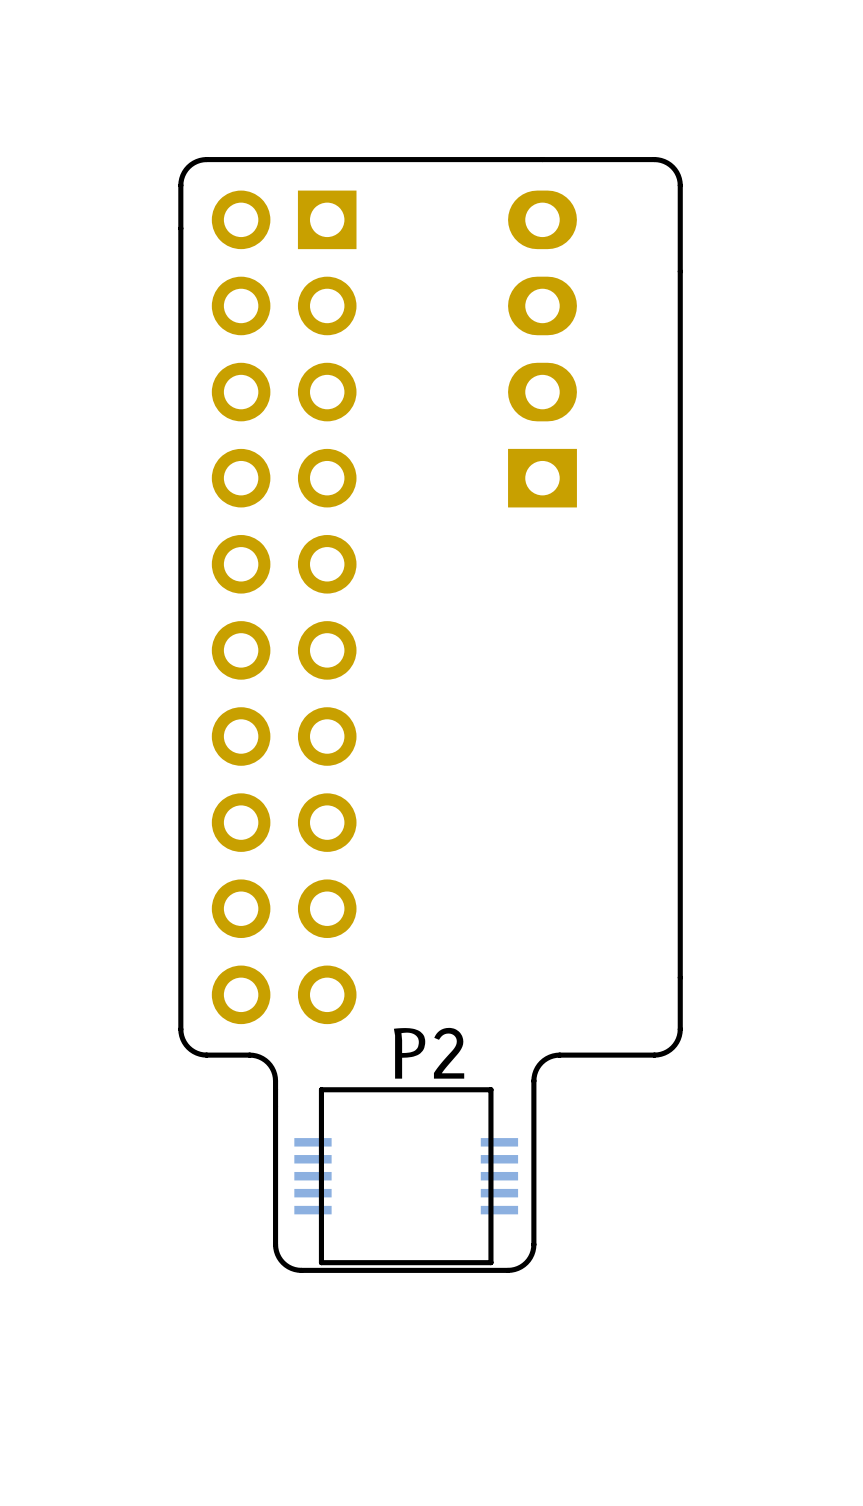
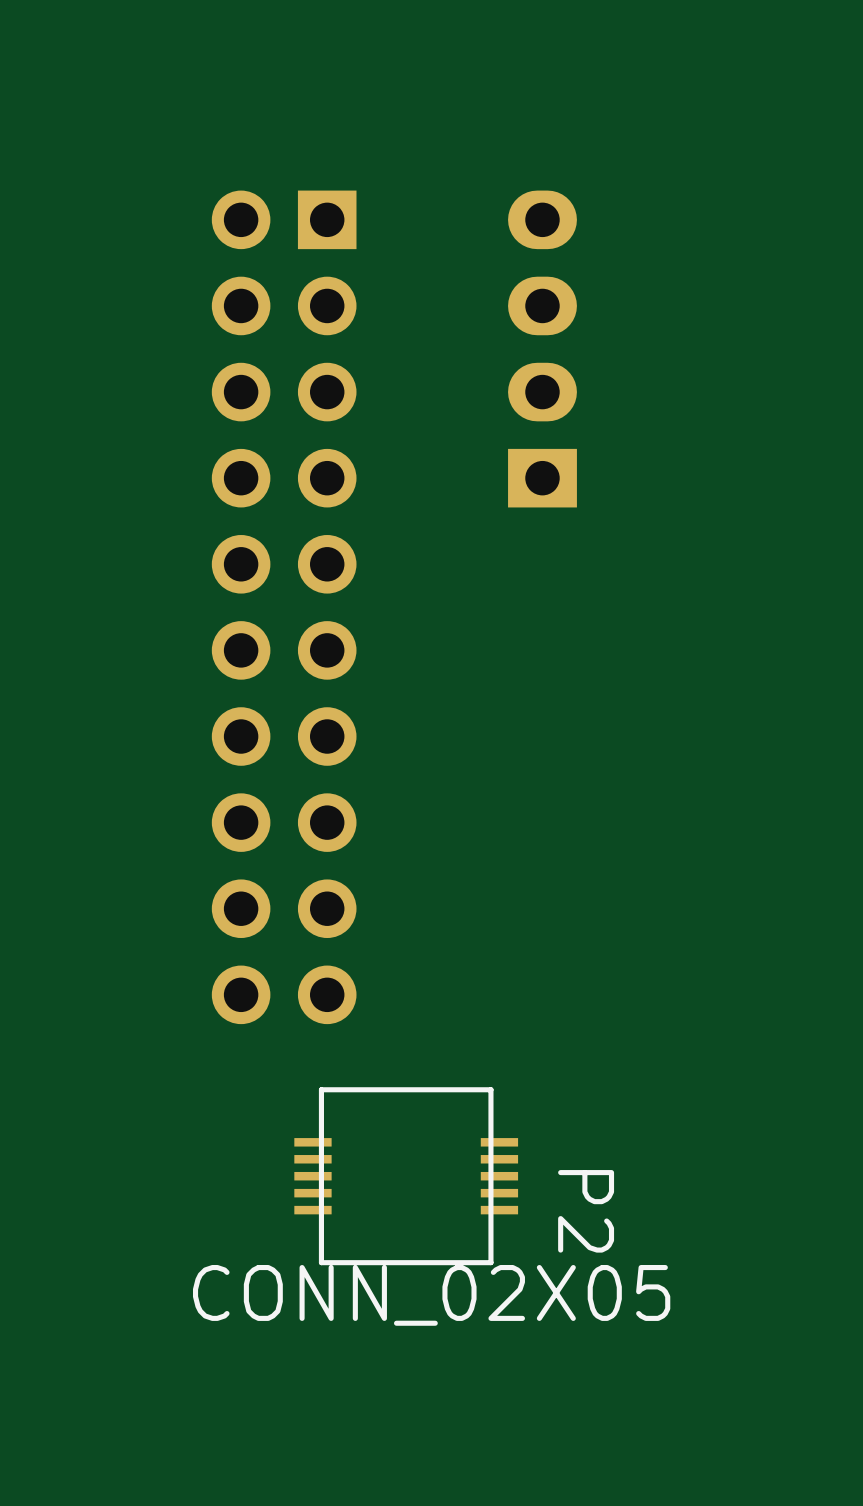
board edge: (654, 159) (206, 159) (190, 164) (181, 178) (181, 1032) (186, 1045) (196, 1053) (256, 1055) (267, 1062) (273, 1071) (275, 1080) (275, 1247) (283, 1262) (294, 1269) (508, 1270) (520, 1266) (528, 1260) (533, 1247) (533, 1080) (539, 1065) (546, 1058) (556, 1055) (661, 1054) (672, 1047) (679, 1035) (680, 185) (678, 175) (672, 167) (664, 161) (654, 159) -> none
P2 name rotation: 0° (429, 1053) -> 90° clockwise (586, 1211)
P2 name position: P2 (429, 1053) -> P2 (586, 1211)
P2 value: none -> CONN_02X05 (431, 1295)

